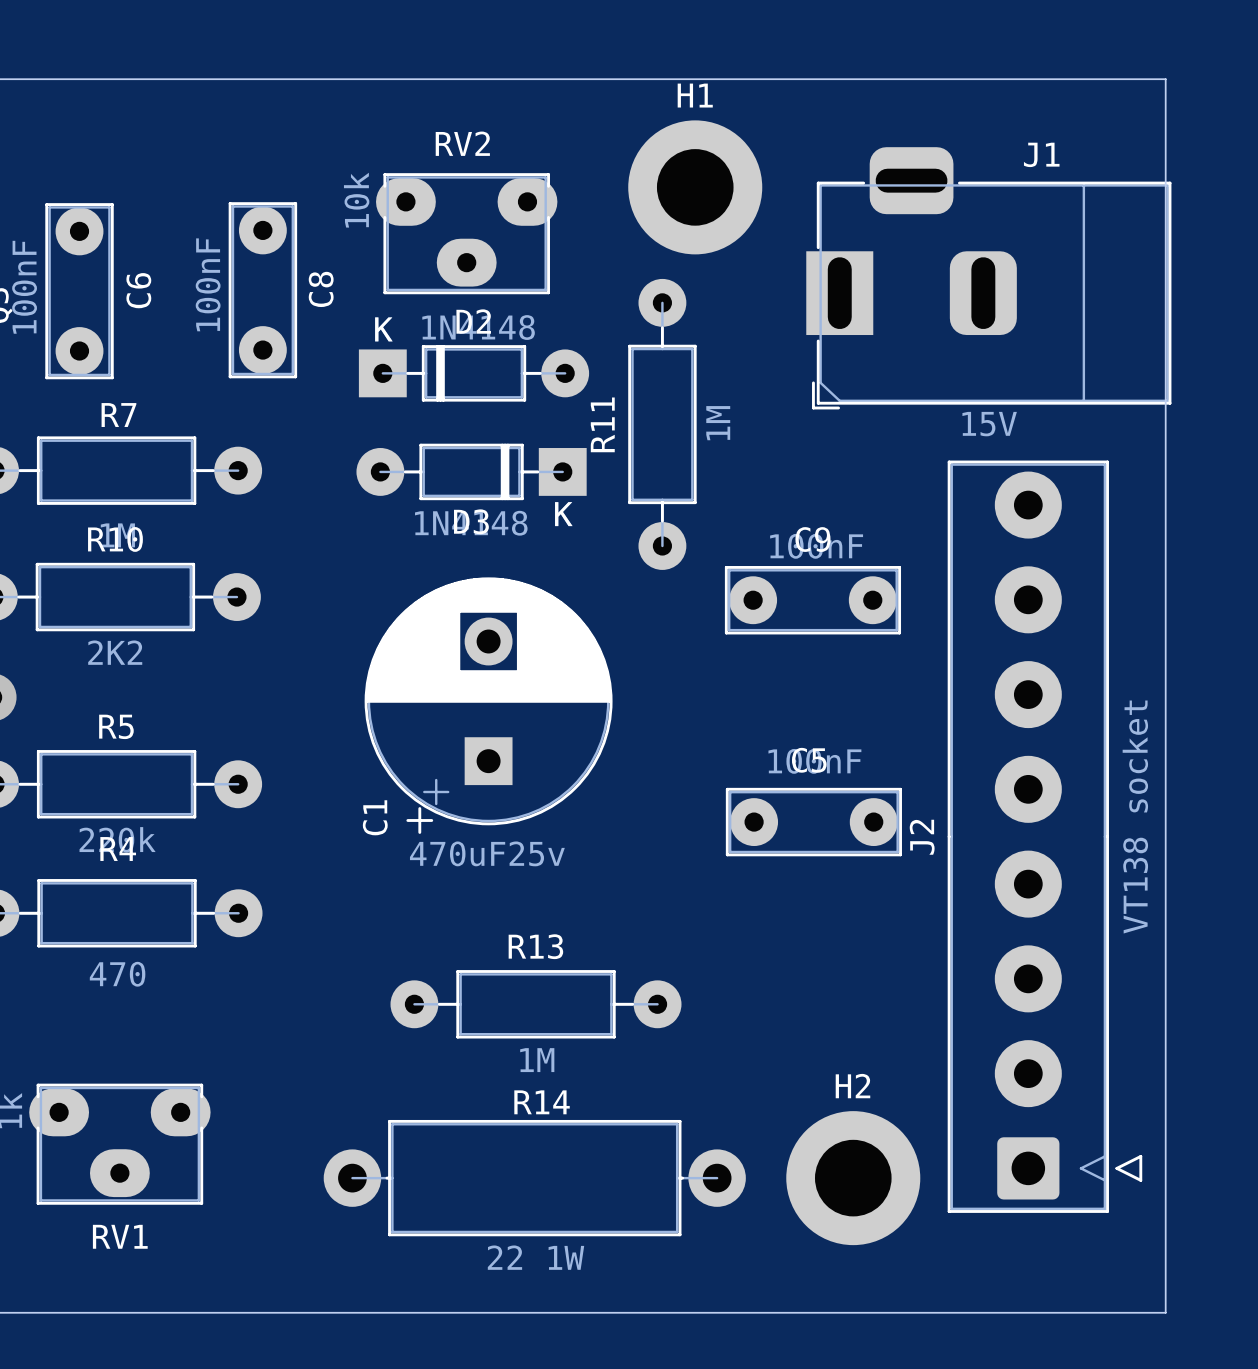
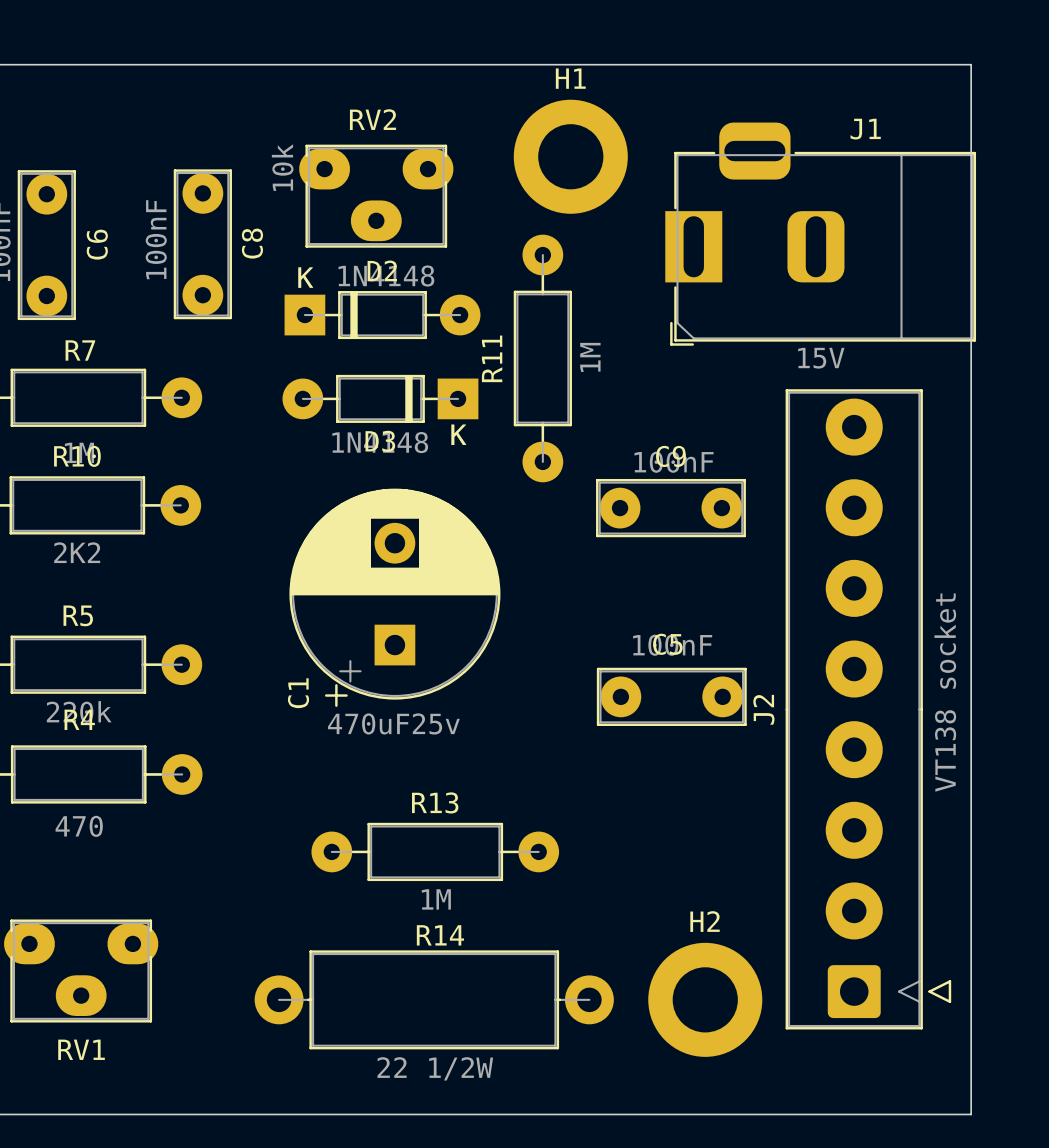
R14 value: 22 1W (536, 1257) -> 22 1/2W (435, 1068)

